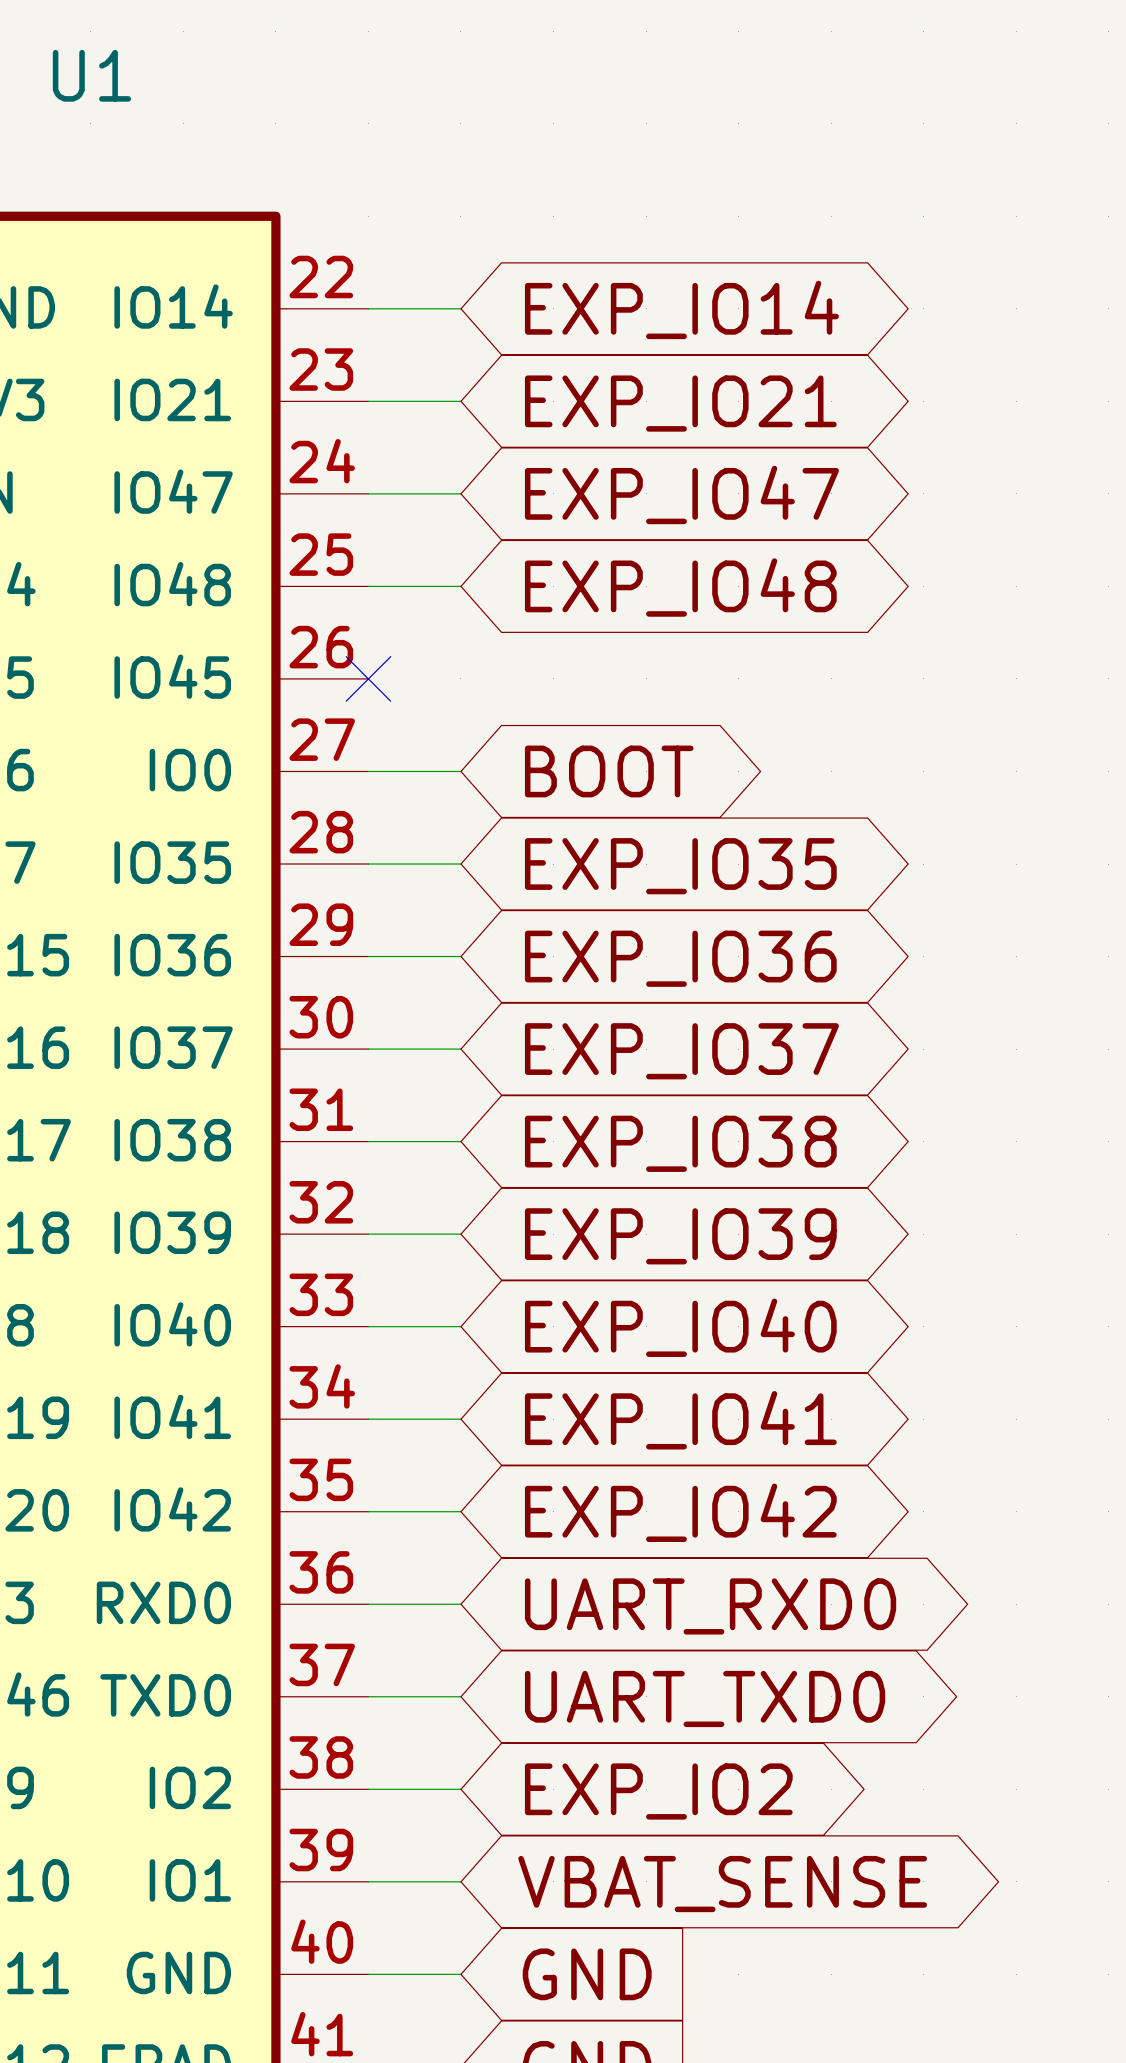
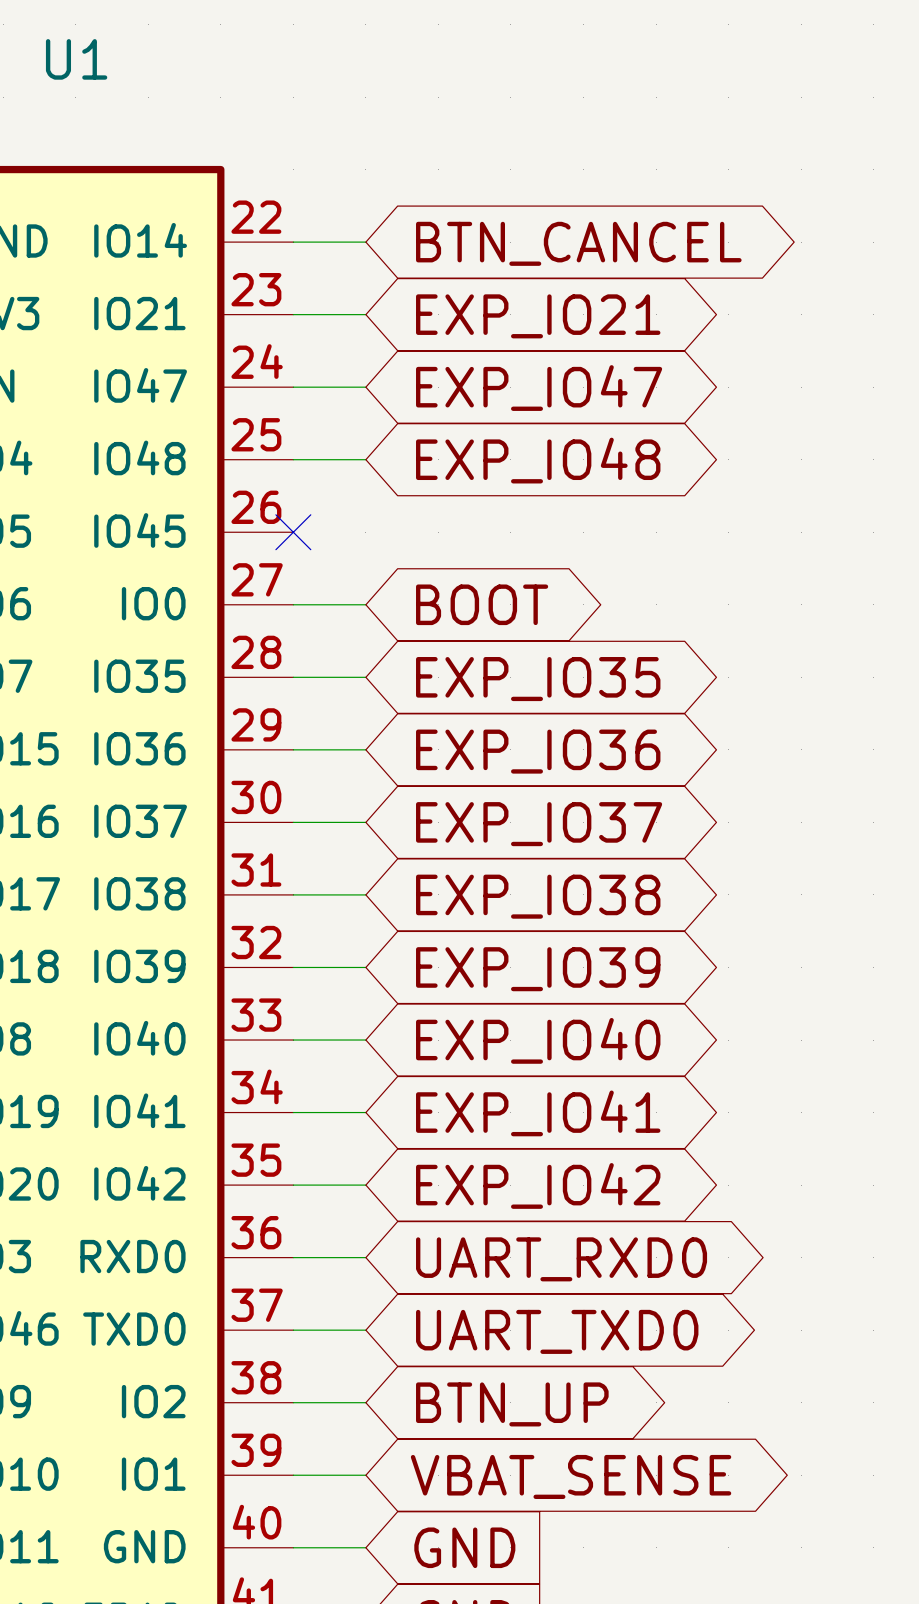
global label: EXP_IO14 (681, 309) -> BTN_CANCEL (578, 243)
global label: EXP_IO2 (658, 1791) -> BTN_UP (512, 1404)

